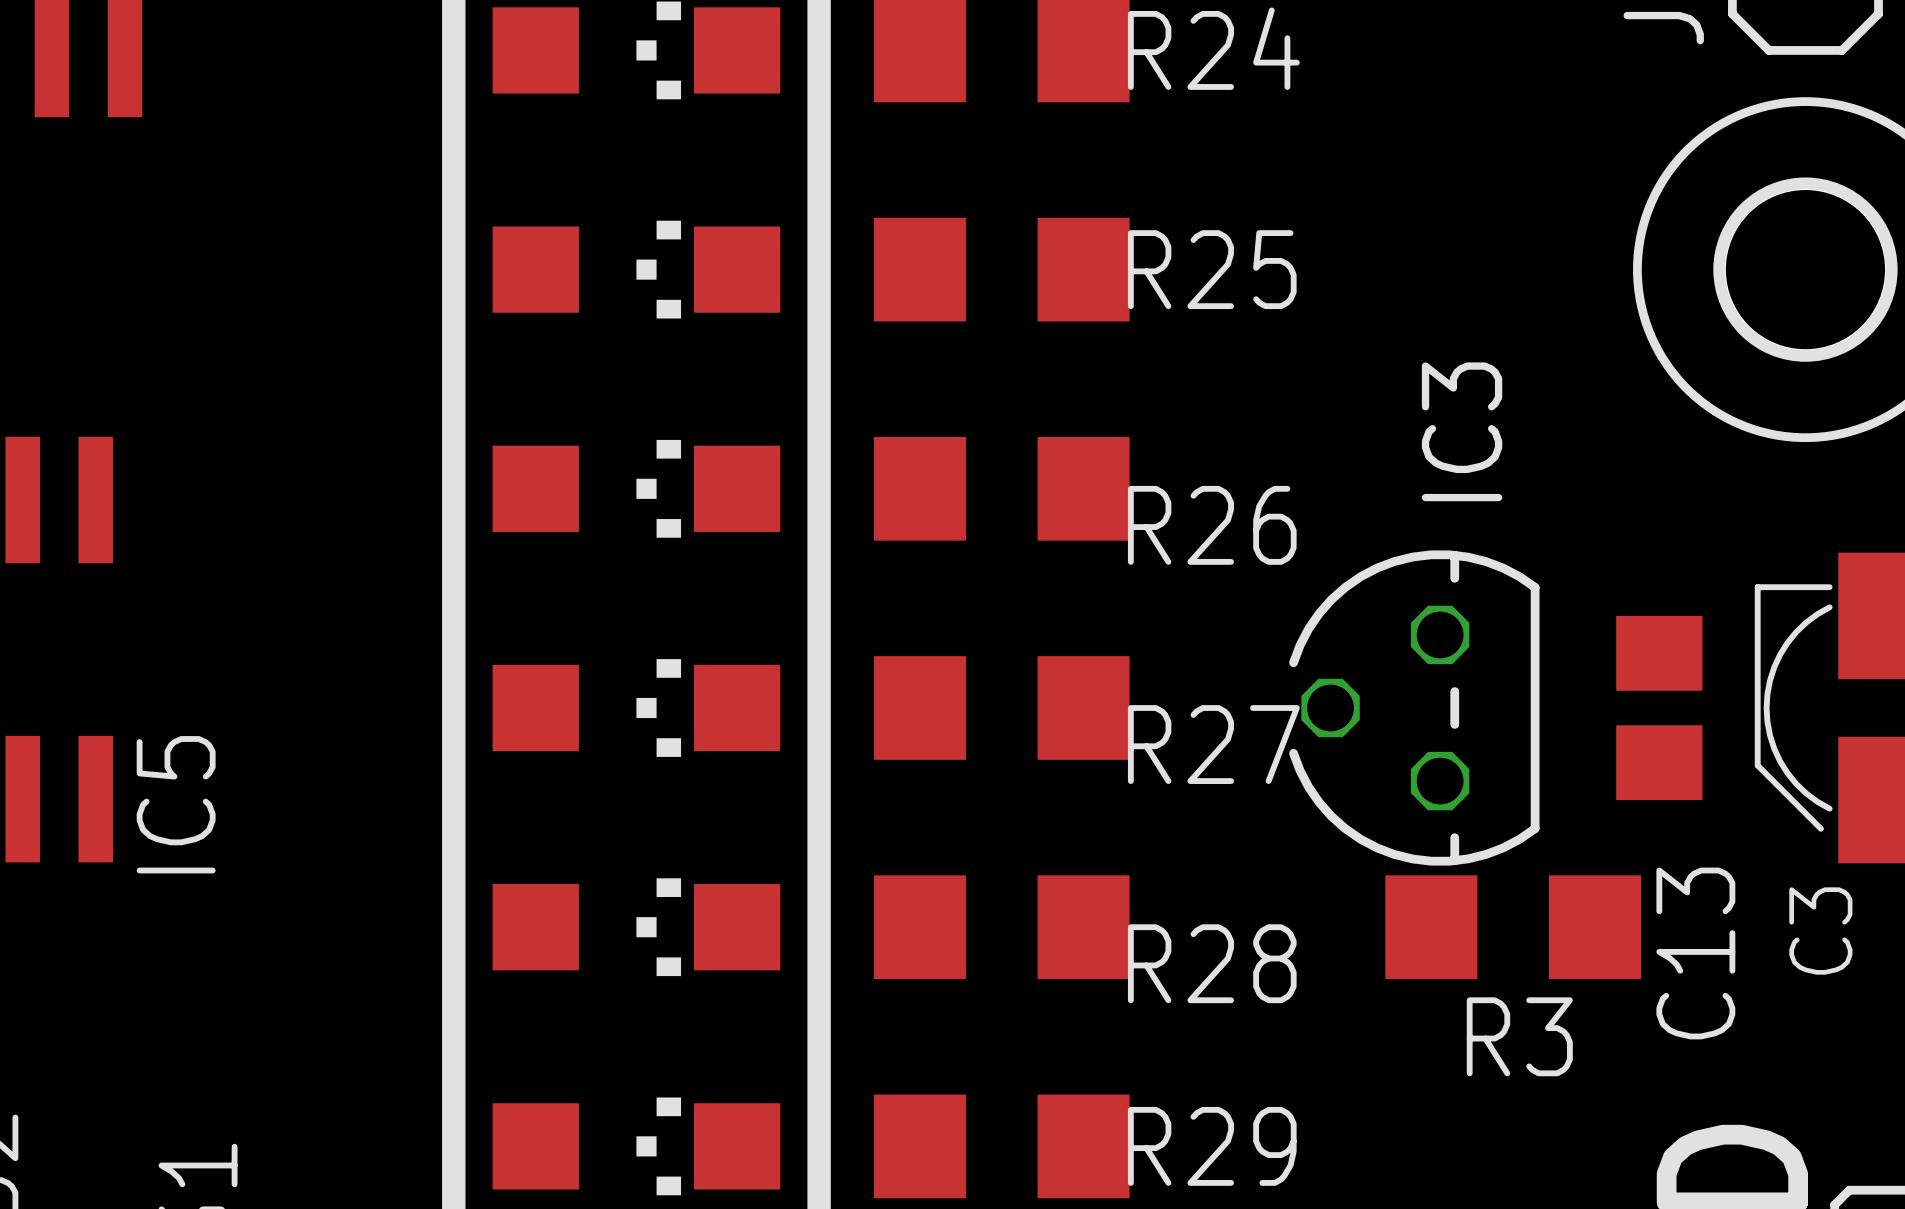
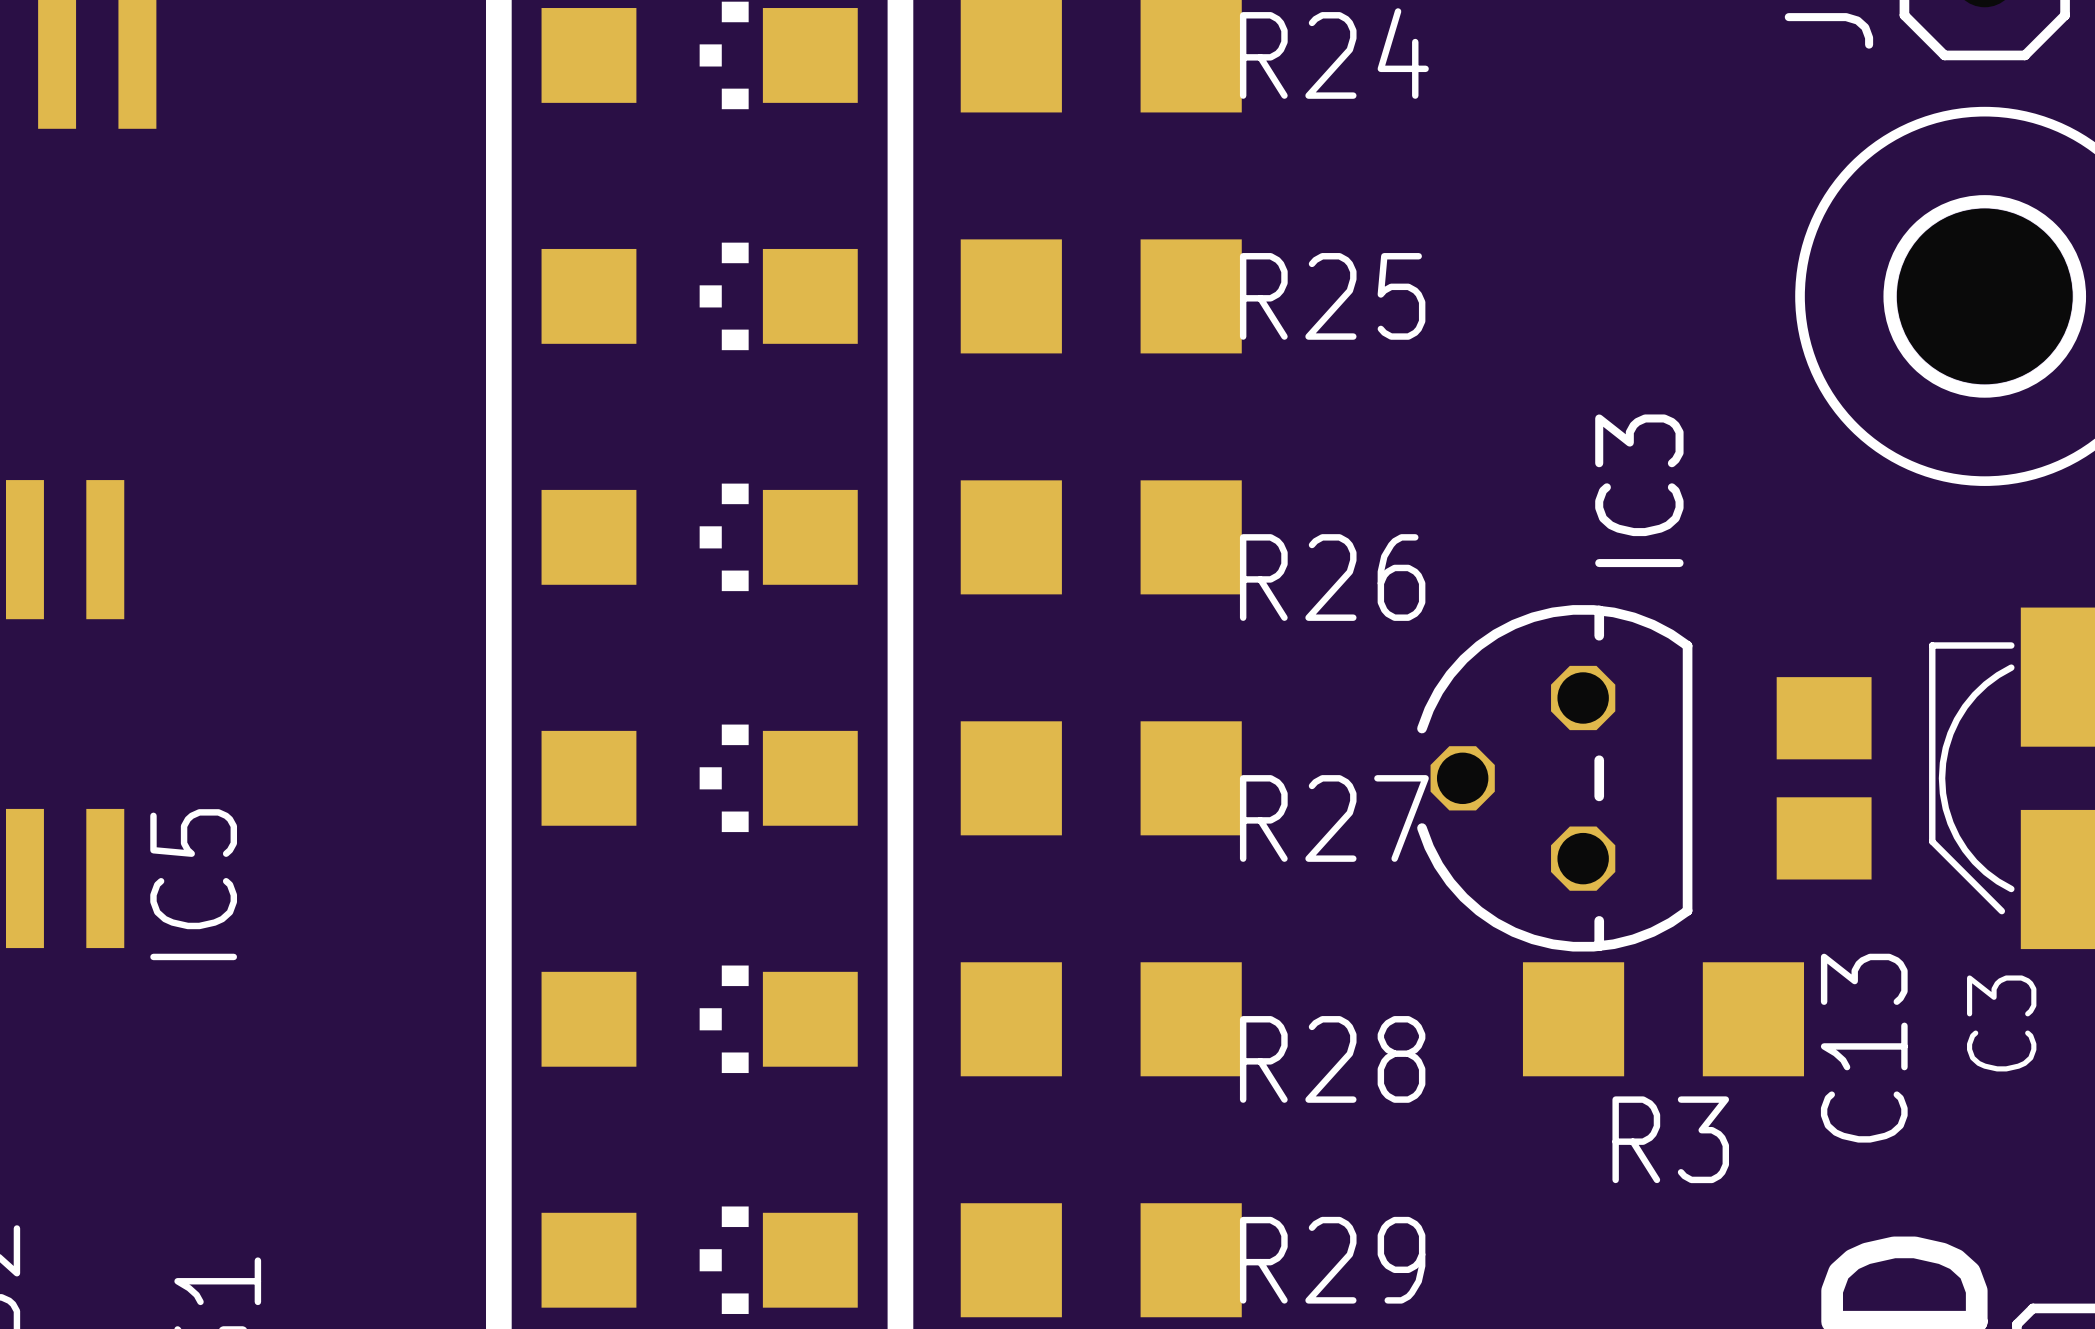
IC3 name position: IC3 (1462, 431) -> IC3 (1639, 490)

